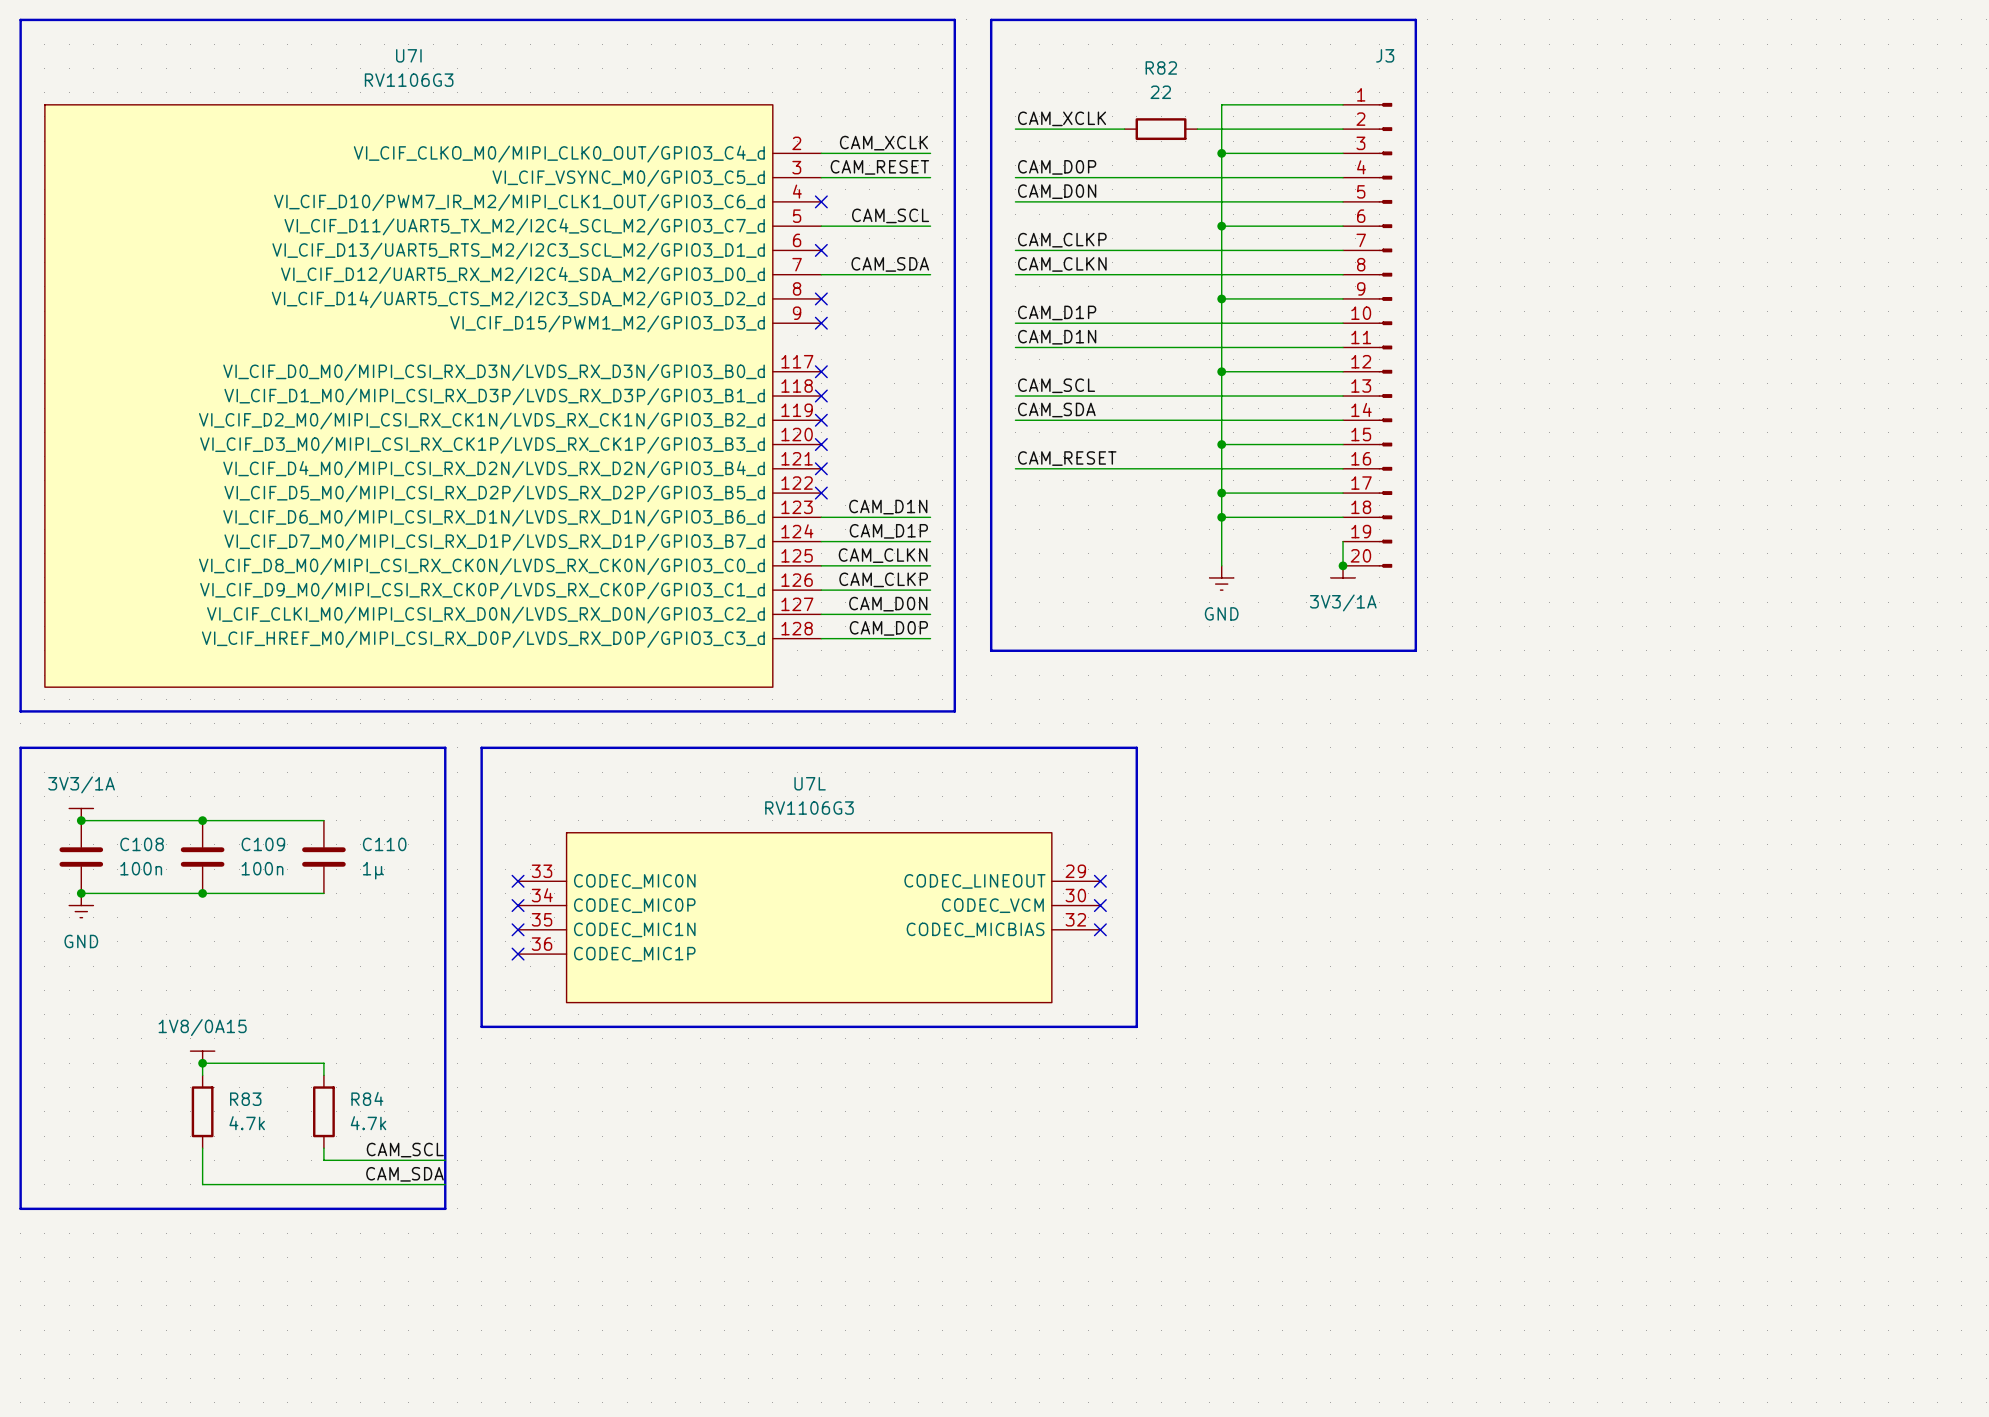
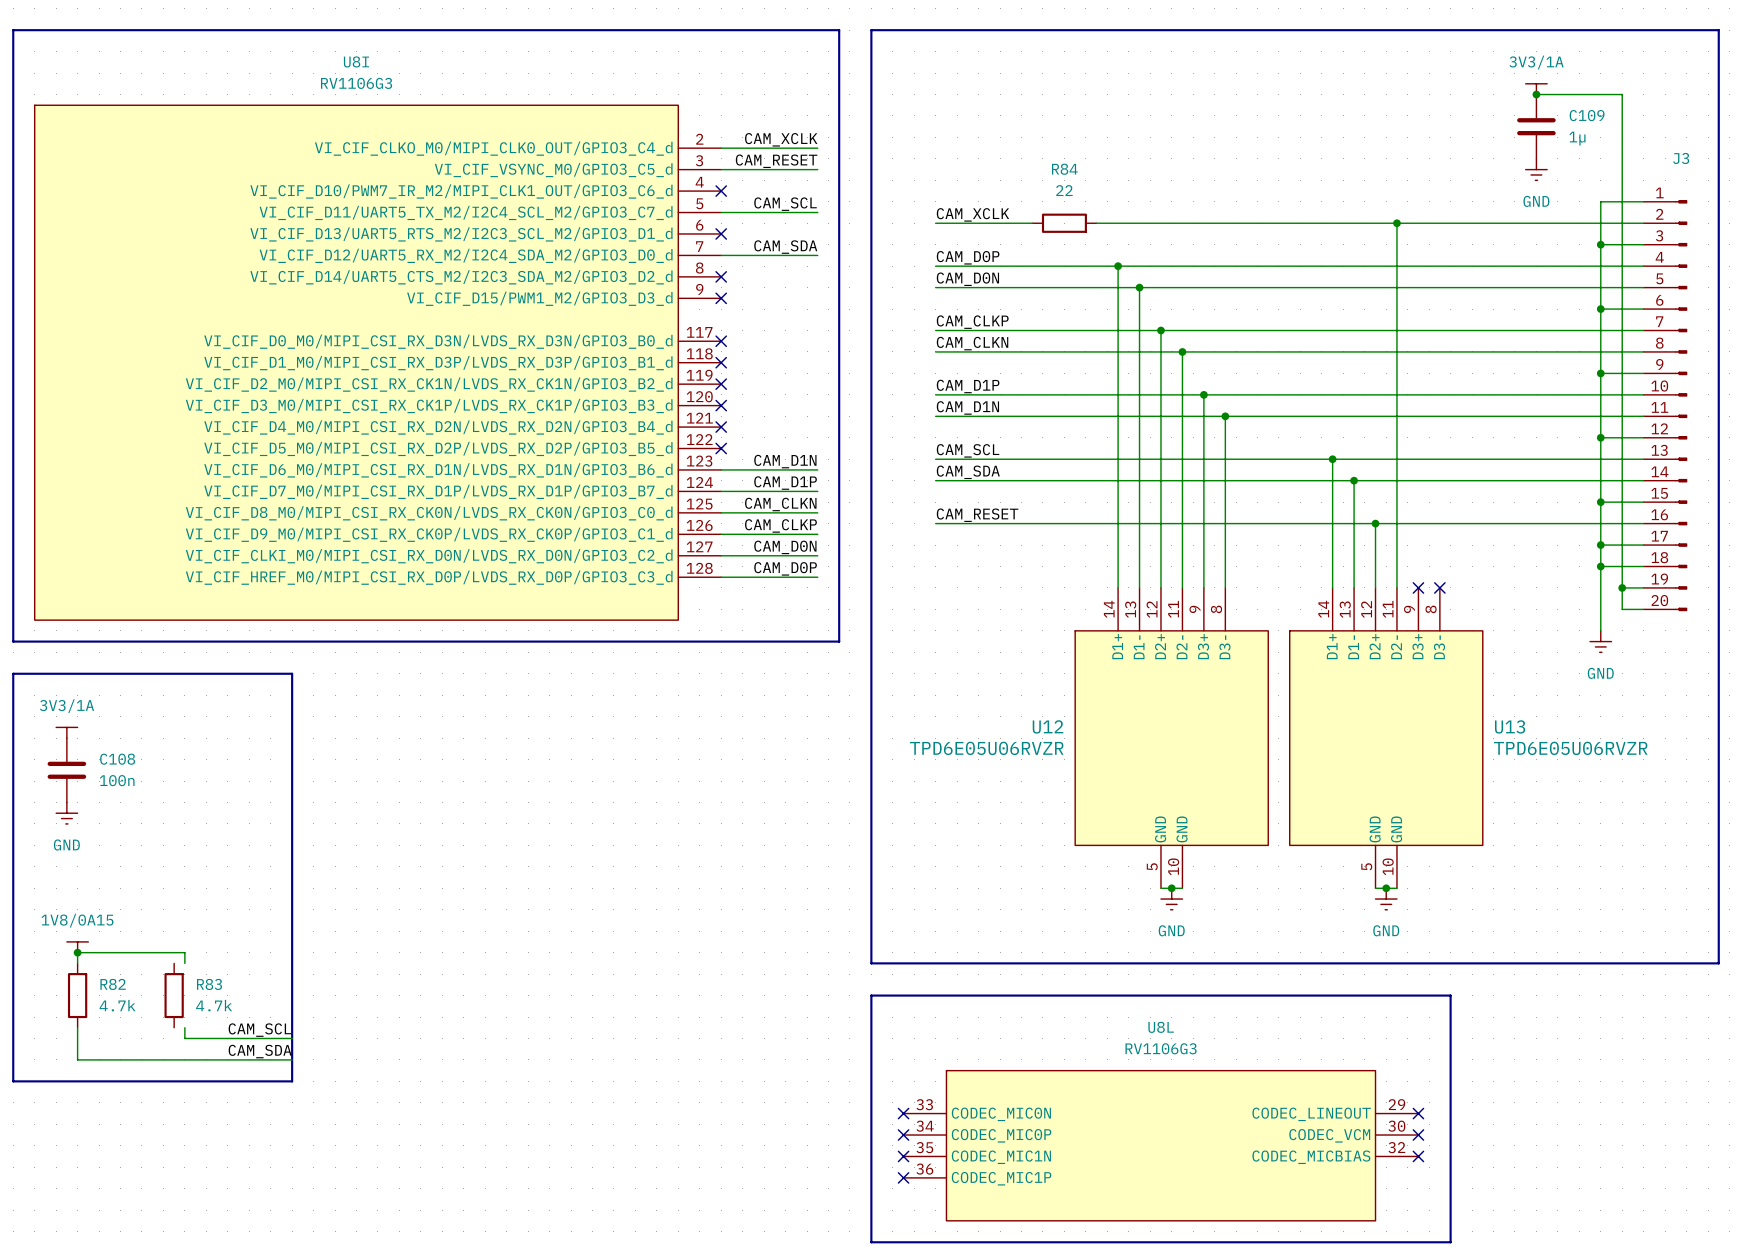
line: (1415, 19) (1415, 650) (991, 650) -> (1246, 30) (1718, 30) (1718, 963) (871, 963) (871, 587)
U7I name: U7I (408, 55) -> U8I (356, 61)
R82 name position: R82 (1161, 67) -> R82 (113, 984)
power symbol: none -> 3V3/1A (1536, 89)
R82 value: 22 (1160, 92) -> 4.7k (117, 1005)
wire: none -> (1536, 94) (1622, 94) (1622, 609) (1643, 609)
junction: none -> (1536, 94)
wire: (1343, 104) (1221, 104) (1221, 565) -> none
label position: CAM_XCLK (1062, 118) -> CAM_XCLK (972, 214)
wire: (1015, 129) (1124, 129) -> (935, 223) (1032, 223)
R82 rotation: 0° (1161, 129) -> 90° clockwise (77, 995)
R82 position: (1161, 129) -> (77, 995)
wire: (1197, 129) (1343, 129) -> none
wire: (1221, 153) (1343, 153) -> none
junction: (1221, 153) -> none
label position: CAM_D0P (1057, 167) -> CAM_D0P (968, 257)
wire: (1015, 177) (1343, 177) -> none
power symbol: none -> GND (1536, 169)
label position: CAM_D0N (1057, 191) -> CAM_D0N (967, 279)
wire: (1015, 201) (1343, 201) -> none
wire: none -> (1643, 201) (1600, 201) (1600, 630)
wire: (1221, 226) (1343, 226) -> none
junction: (1221, 226) -> none
wire: none -> (1096, 223) (1643, 223)
wire: none -> (1396, 223) (1396, 587)
junction: none -> (1396, 223)
label position: CAM_CLKP (1062, 240) -> CAM_CLKP (972, 322)
wire: (1015, 250) (1343, 250) -> none
wire: none -> (1600, 244) (1643, 244)
junction: none -> (1600, 244)
label position: CAM_CLKN (1062, 264) -> CAM_CLKN (972, 343)
wire: (1015, 274) (1343, 274) -> none
wire: none -> (935, 266) (1643, 266)
wire: none -> (1118, 266) (1118, 587)
junction: none -> (1118, 266)
wire: (1221, 298) (1343, 298) -> none
junction: (1221, 298) -> none
wire: none -> (935, 287) (1643, 287)
wire: none -> (1139, 287) (1139, 587)
junction: none -> (1139, 287)
label position: CAM_D1P (1057, 312) -> CAM_D1P (968, 386)
wire: (1015, 323) (1343, 323) -> none
J3 position: (1367, 335) -> (1665, 405)
wire: none -> (1600, 309) (1643, 309)
junction: none -> (1600, 309)
label position: CAM_D1N (1057, 337) -> CAM_D1N (967, 407)
wire: (1015, 347) (1343, 347) -> none
wire: none -> (935, 330) (1643, 330)
wire: none -> (1160, 330) (1160, 587)
junction: none -> (1160, 330)
wire: (1221, 371) (1343, 371) -> none
junction: (1221, 371) -> none
wire: none -> (935, 351) (1643, 351)
wire: none -> (1182, 351) (1182, 491)
junction: none -> (1182, 351)
label position: CAM_SCL (1056, 385) -> CAM_SCL (968, 450)
wire: (1015, 396) (1343, 396) -> none
wire: none -> (1600, 373) (1643, 373)
junction: none -> (1600, 373)
label position: CAM_SDA (1056, 410) -> CAM_SDA (968, 472)
wire: (1015, 420) (1343, 420) -> none
wire: none -> (935, 394) (1643, 394)
wire: none -> (1203, 394) (1203, 587)
junction: none -> (1203, 394)
wire: (1221, 444) (1343, 444) -> none
junction: (1221, 444) -> none
wire: none -> (935, 416) (1643, 416)
wire: none -> (1225, 416) (1225, 587)
junction: none -> (1225, 416)
label position: CAM_RESET (1067, 458) -> CAM_RESET (977, 515)
wire: (1015, 468) (1343, 468) -> none
wire: none -> (1600, 437) (1643, 437)
junction: none -> (1600, 437)
wire: (1221, 493) (1343, 493) -> none
junction: (1221, 493) -> none
wire: none -> (935, 459) (1643, 459)
wire: none -> (1332, 459) (1332, 587)
junction: none -> (1332, 459)
wire: (1221, 517) (1343, 517) -> none
junction: (1221, 517) -> none
wire: none -> (935, 480) (1643, 480)
wire: none -> (1354, 480) (1354, 587)
junction: none -> (1354, 480)
wire: none -> (1600, 502) (1643, 502)
junction: none -> (1600, 502)
wire: none -> (1182, 512) (1182, 587)
junction: (1343, 565) -> none
power symbol: 3V3/1A (1343, 571) -> none
wire: none -> (935, 523) (1643, 523)
power symbol: GND (1221, 577) -> none
wire: none -> (1375, 523) (1375, 587)
junction: none -> (1375, 523)
wire: none -> (1600, 545) (1643, 545)
junction: none -> (1600, 545)
wire: none -> (1600, 566) (1643, 566)
junction: none -> (1600, 566)
no-connect mark: none -> (1418, 587)
no-connect mark: none -> (1439, 587)
wire: none -> (1622, 587) (1643, 587)
junction: none -> (1622, 587)
power symbol: none -> GND (1600, 641)
line: (336, 747) (445, 747) (445, 1208) (336, 1208) -> (292, 673) (292, 1081)
line: (481, 747) (1136, 747) (1136, 1026) (481, 1026) (481, 747) -> none
wire: (81, 820) (323, 820) -> none
junction: (81, 820) -> none
junction: (202, 820) -> none
U12: none -> TPD6E05U06RVZR (1171, 738)
U13: none -> TPD6E05U06RVZR (1386, 738)
C109 position: (202, 857) -> (1536, 126)
C110: 1µ (323, 857) -> none
C109 value: 100n (262, 868) -> 1µ (1577, 138)
no-connect mark: (518, 881) -> none
no-connect mark: (1100, 881) -> none
wire: (81, 893) (323, 893) -> none
junction: (81, 893) -> none
junction: (202, 893) -> none
no-connect mark: (518, 905) -> none
no-connect mark: (1100, 905) -> none
U7L: RV1106G3 (809, 917) -> none
no-connect mark: (518, 929) -> none
no-connect mark: (1100, 929) -> none
no-connect mark: (518, 954) -> none
wire: none -> (1160, 888) (1182, 888)
junction: none -> (1171, 888)
wire: none -> (1375, 888) (1396, 888)
junction: none -> (1386, 888)
power symbol: none -> GND (1171, 899)
power symbol: none -> GND (1386, 899)
power symbol position: 1V8/0A15 (202, 1057) -> 1V8/0A15 (77, 947)
junction: none -> (77, 952)
wire: (202, 1063) (202, 1075) -> (174, 952) (77, 952) (77, 963)
junction: (202, 1063) -> none
wire: (214, 1063) (323, 1063) (323, 1075) -> (184, 952) (184, 963)
R84 name position: R84 (367, 1098) -> R84 (1064, 169)
R84 rotation: 0° (323, 1111) -> 90° clockwise (1064, 223)
R84 position: (323, 1111) -> (1064, 223)
line: none -> (871, 995) (871, 1242) (1450, 1242) (1450, 995) (871, 995)
R84 value: 4.7k (368, 1123) -> 22 (1064, 190)
wire: (202, 1148) (202, 1184) -> (77, 1027) (77, 1059) (174, 1059)
wire: (323, 1148) (323, 1160) -> (184, 1027) (184, 1038) (281, 1038)
label position: CAM_SCL (405, 1150) -> CAM_SCL (259, 1030)
wire: (336, 1160) (445, 1160) -> none
label position: CAM_SDA (405, 1174) -> CAM_SDA (260, 1051)
wire: (336, 1184) (445, 1184) -> none
no-connect mark: none -> (903, 1113)
no-connect mark: none -> (1418, 1113)
no-connect mark: none -> (903, 1135)
no-connect mark: none -> (1418, 1135)
U8L: none -> RV1106G3 (1160, 1145)
no-connect mark: none -> (903, 1156)
no-connect mark: none -> (1418, 1156)
no-connect mark: none -> (903, 1177)

